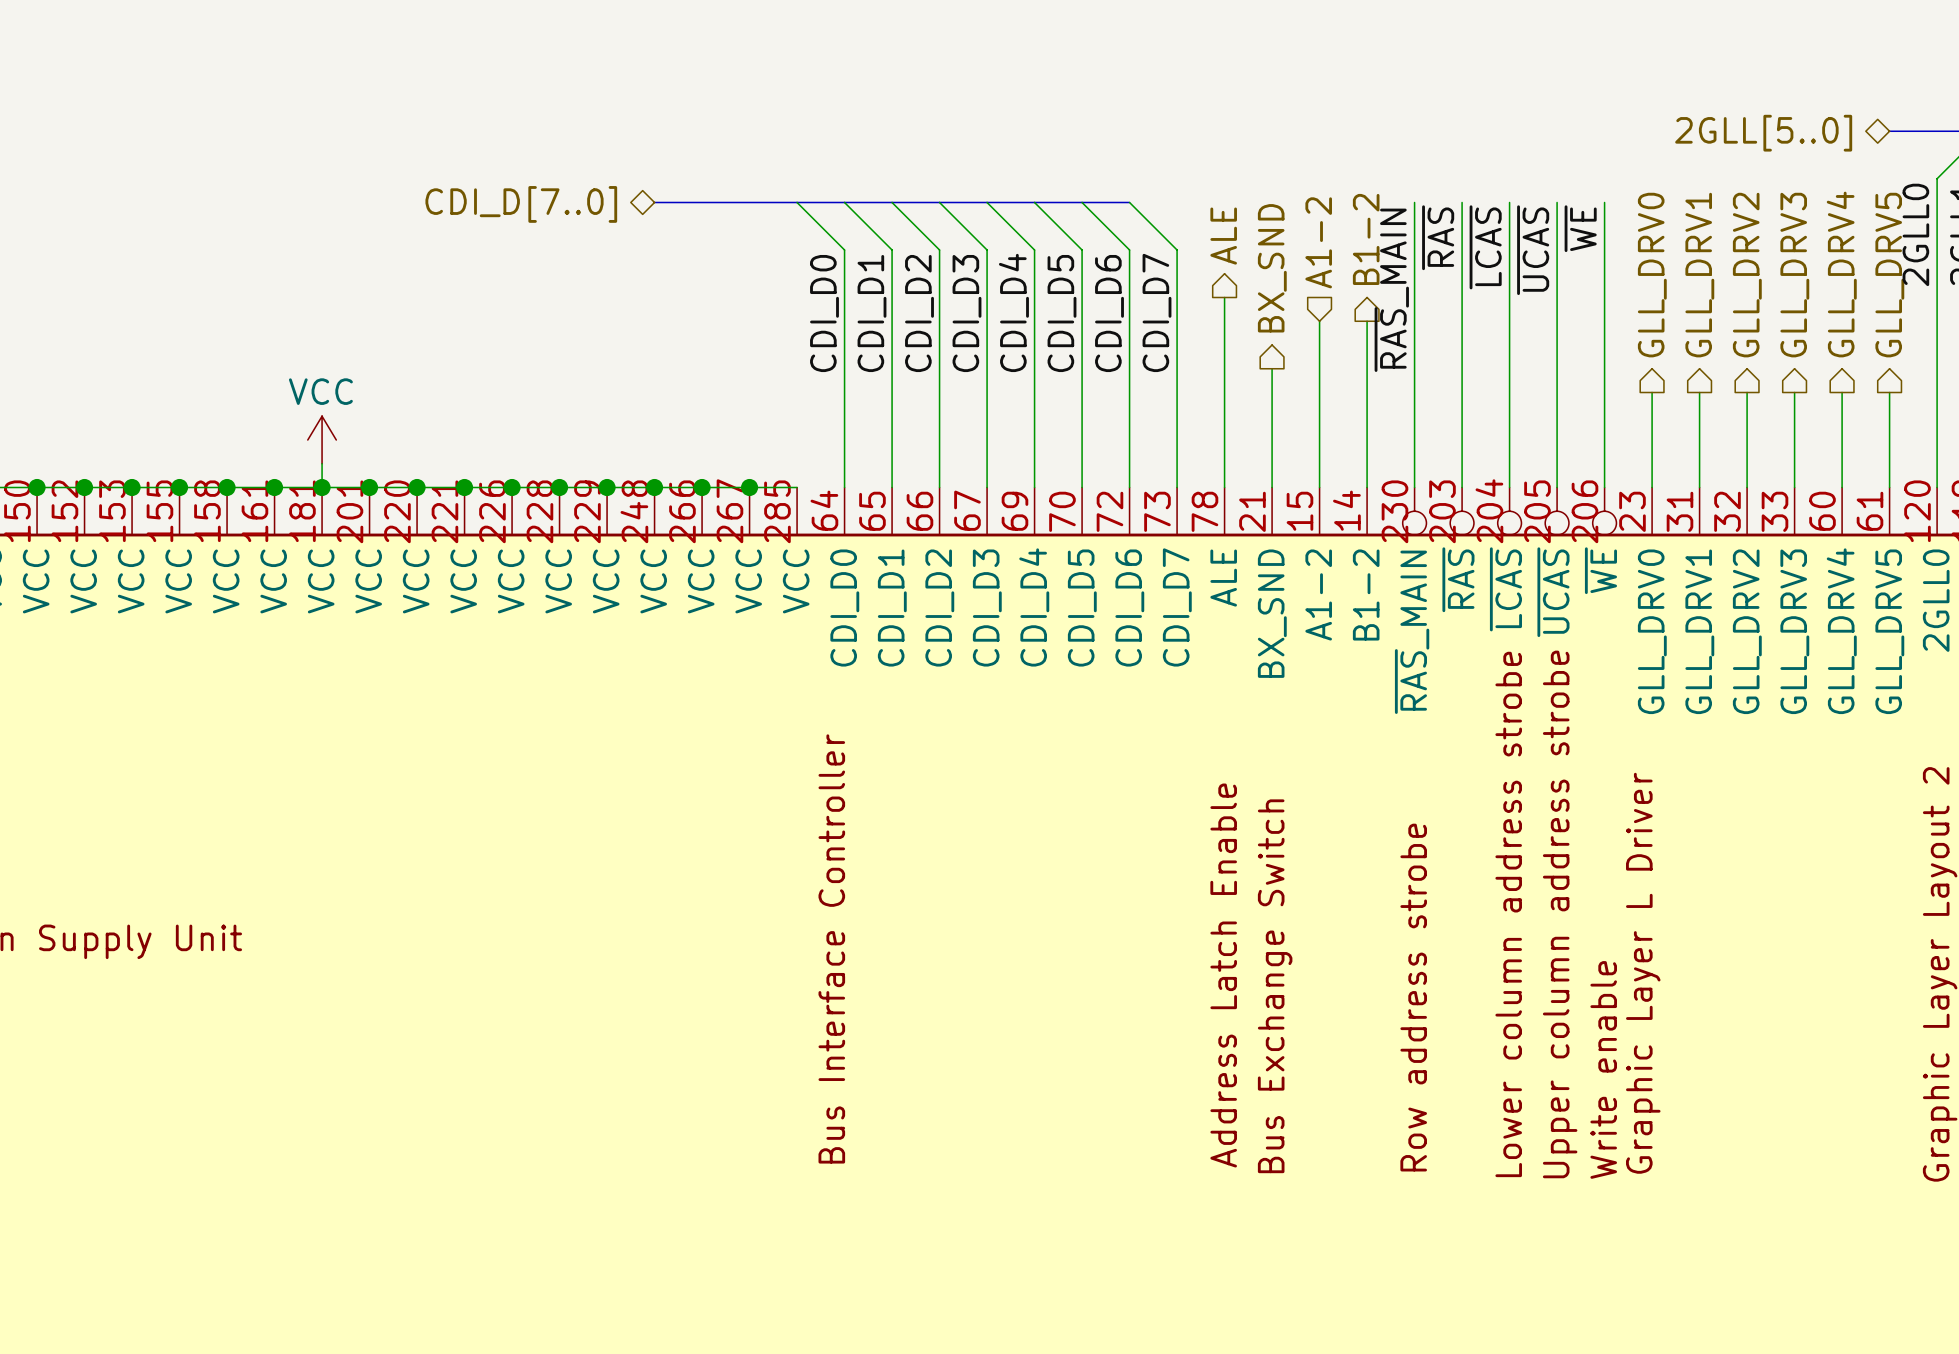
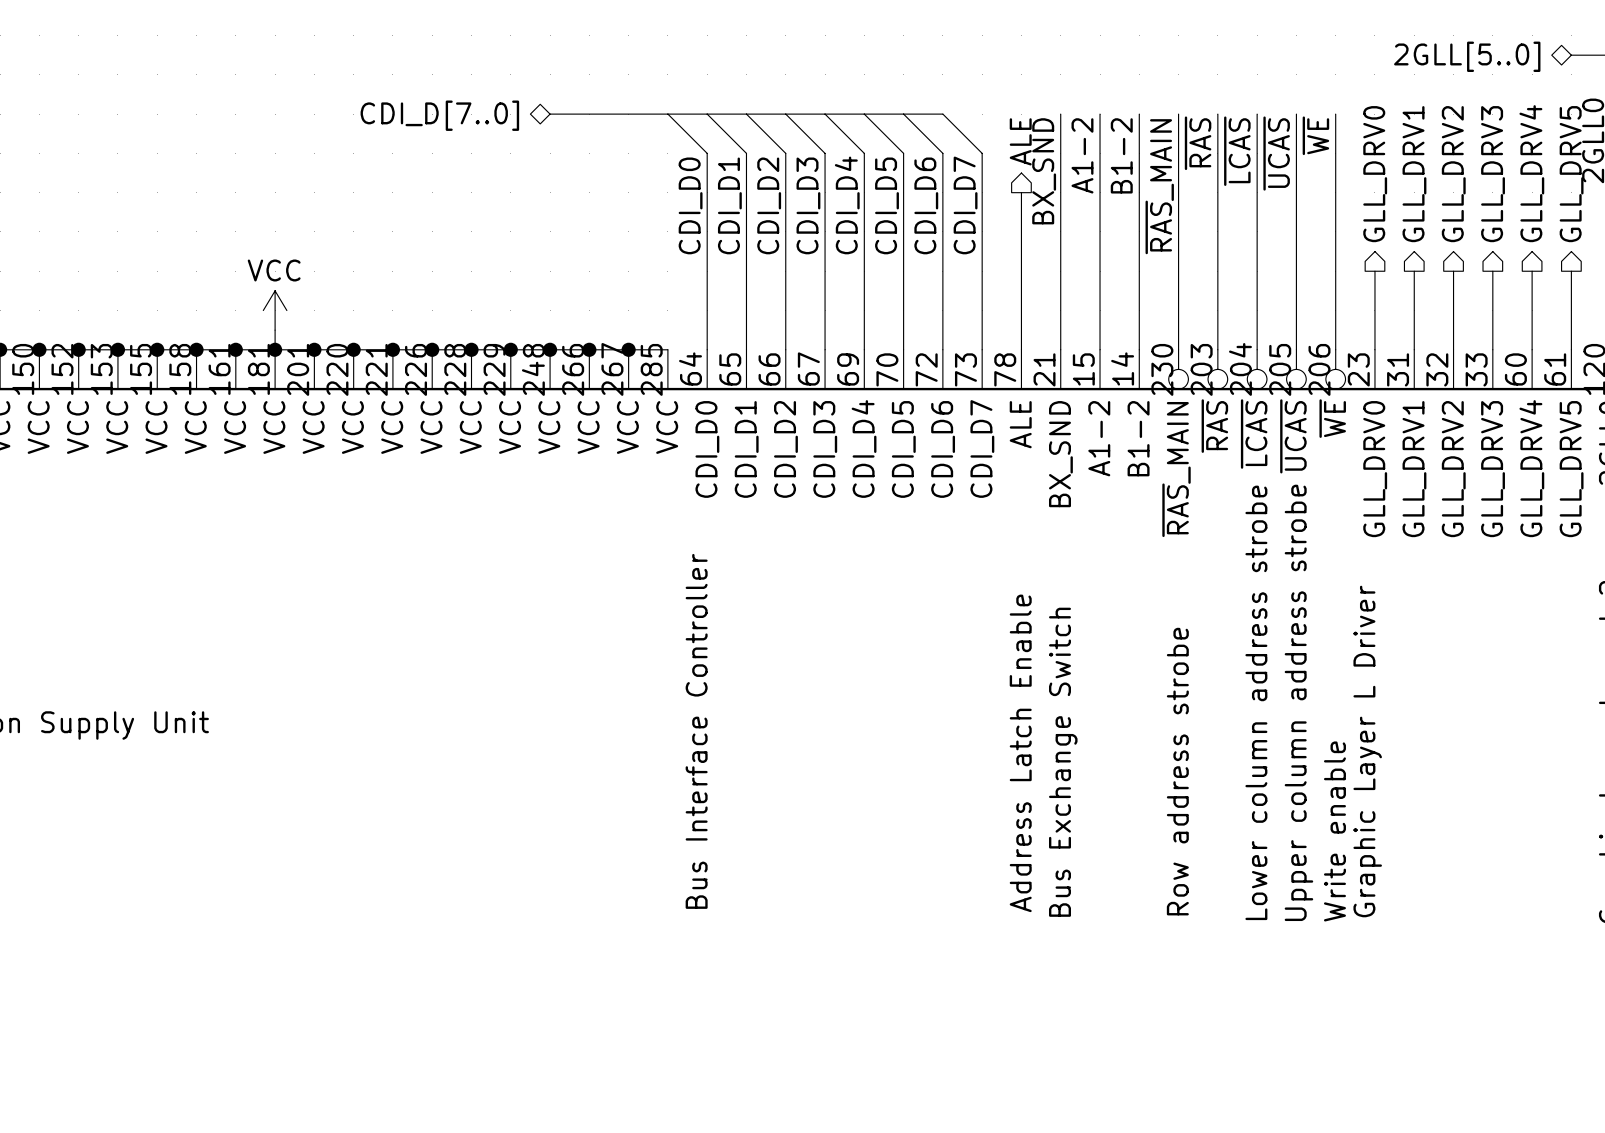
wire: none -> (1060, 114) (1060, 251)
wire: none -> (1100, 114) (1100, 212)
wire: none -> (1139, 114) (1139, 212)
hierarchical label: B1-2 (1366, 239) -> none
hierarchical label: A1-2 (1318, 242) -> none
label: none -> A1-2 (1082, 155)
label: none -> B1-2 (1121, 155)
hierarchical label: BX_SND (1272, 268) -> none
label: none -> BX_SND (1044, 171)

